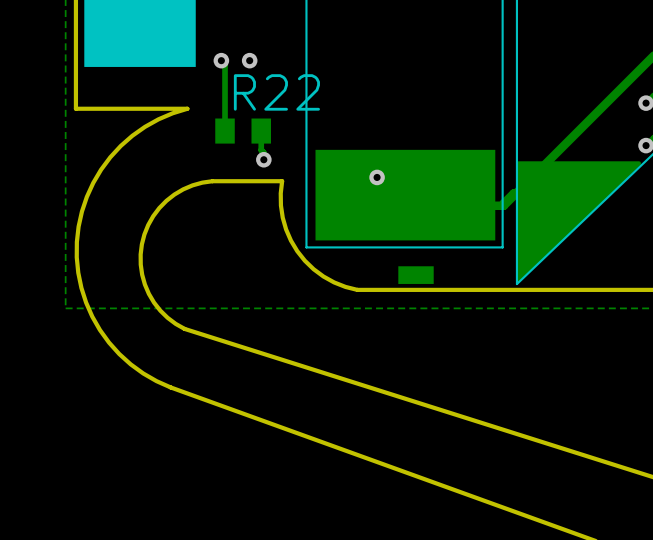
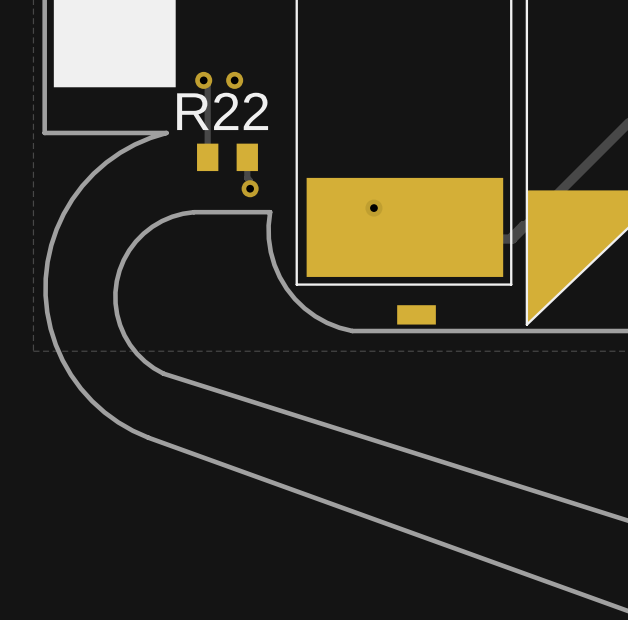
R22 name position: R22 (276, 92) -> R22 (222, 111)

